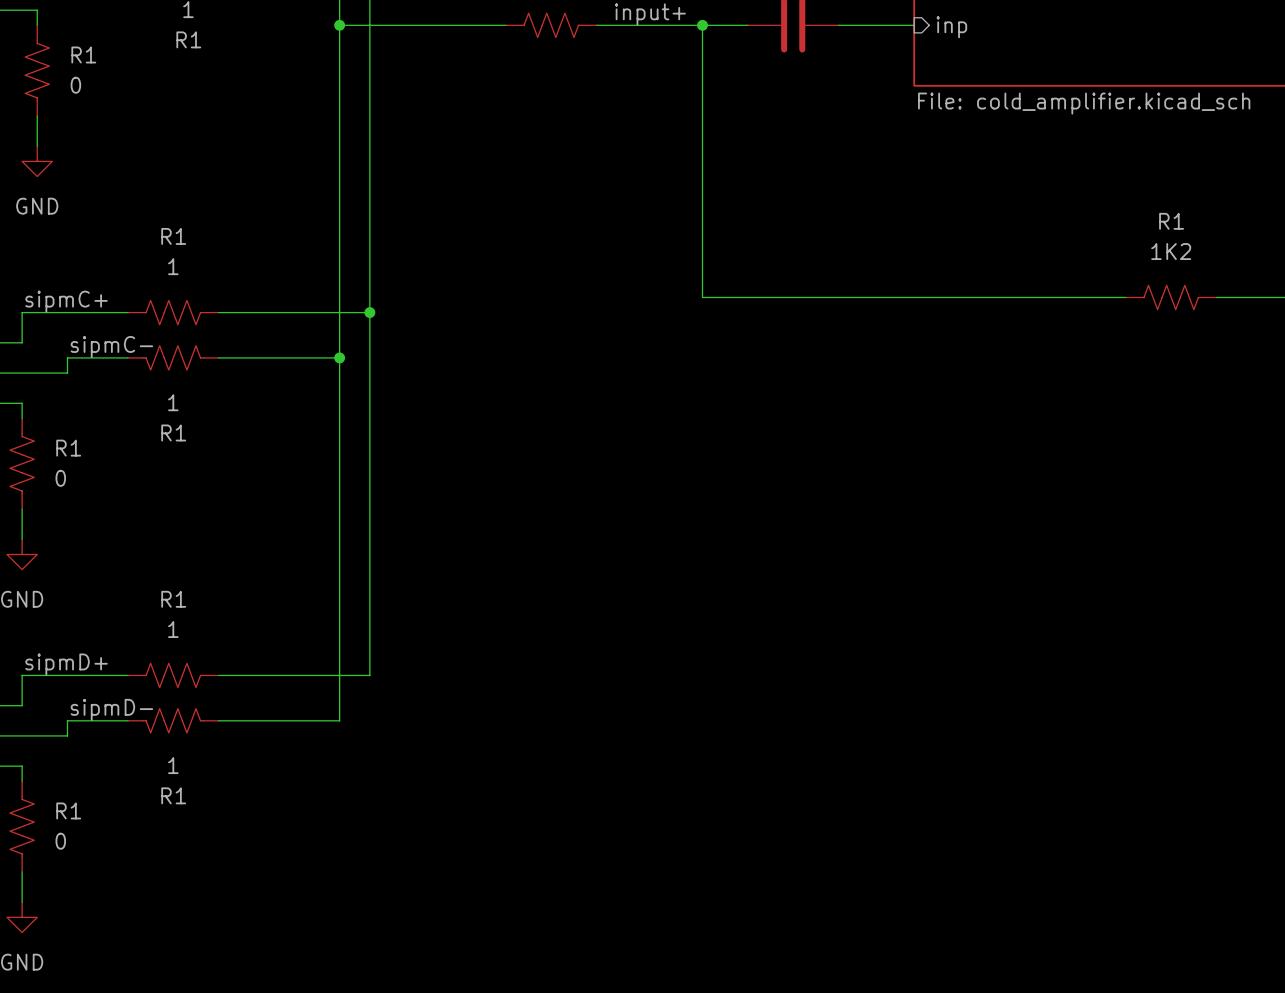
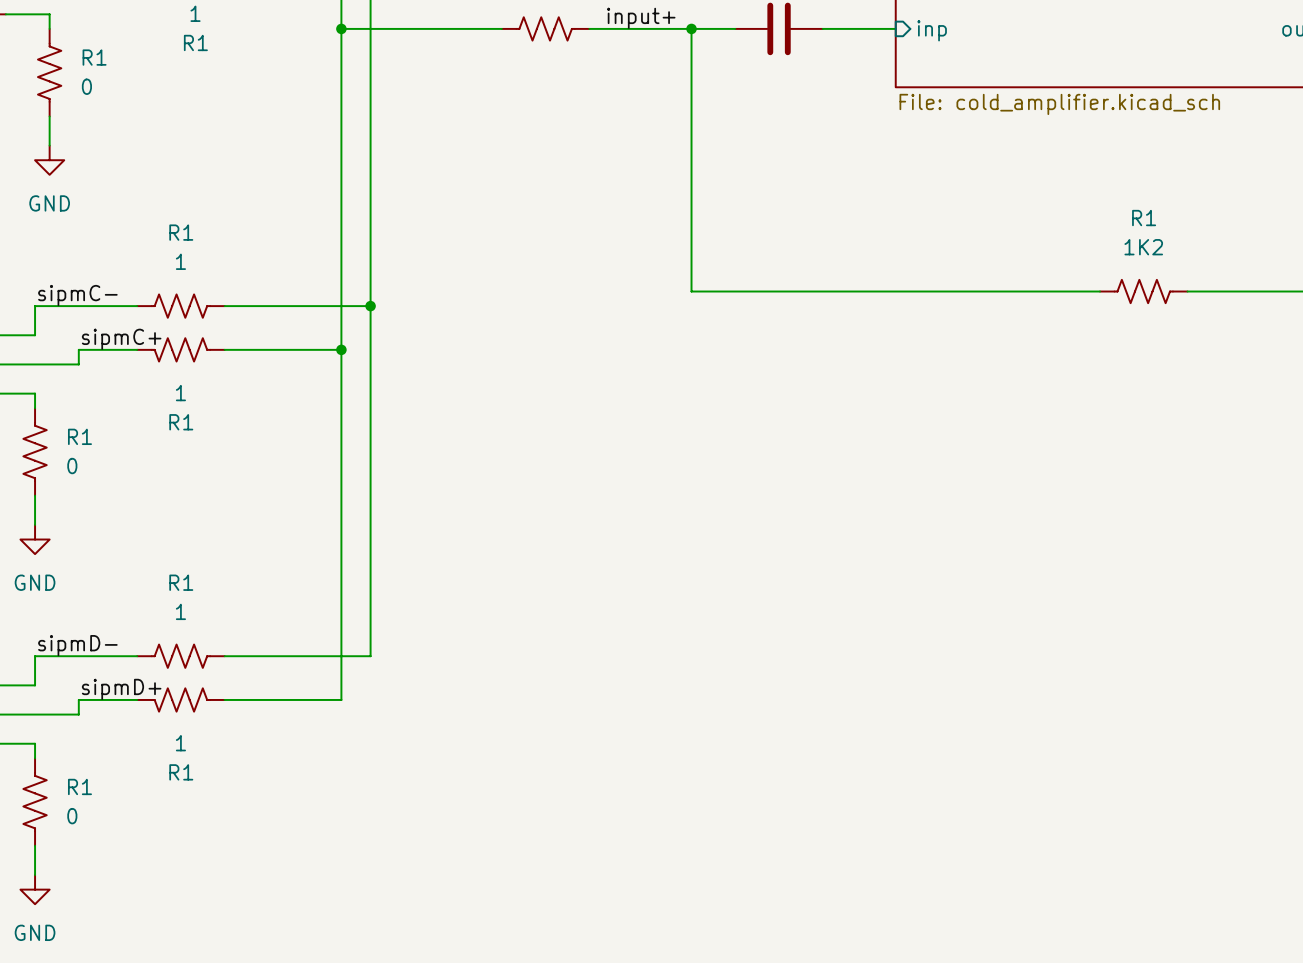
label: sipmC+ (66, 301) -> sipmC- (77, 295)
label: sipmC- (111, 346) -> sipmC+ (121, 339)
label: sipmD+ (66, 664) -> sipmD- (77, 645)
label: sipmD- (111, 709) -> sipmD+ (121, 689)

